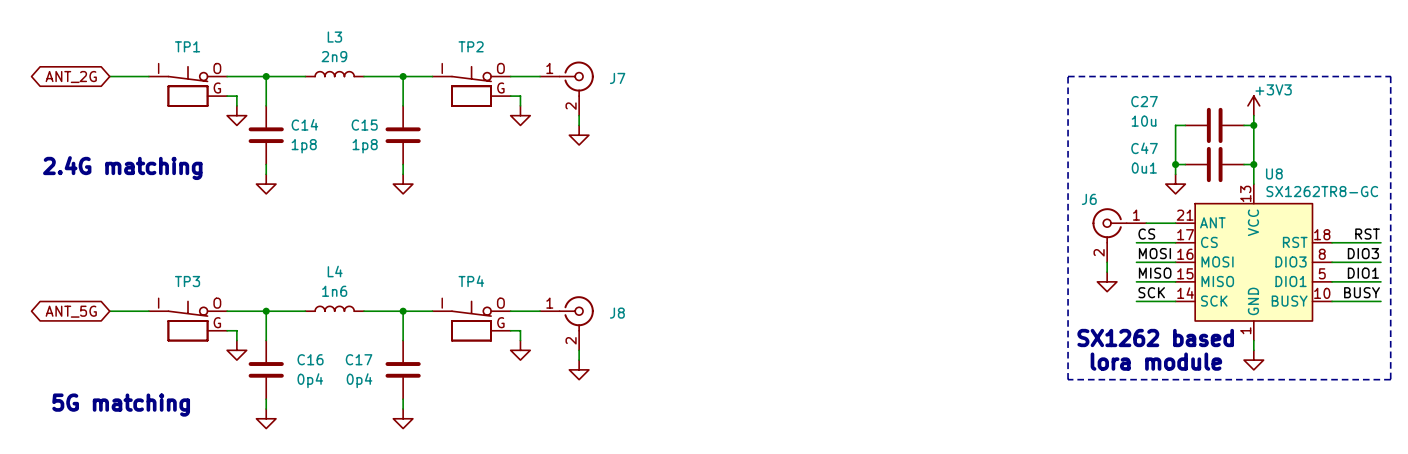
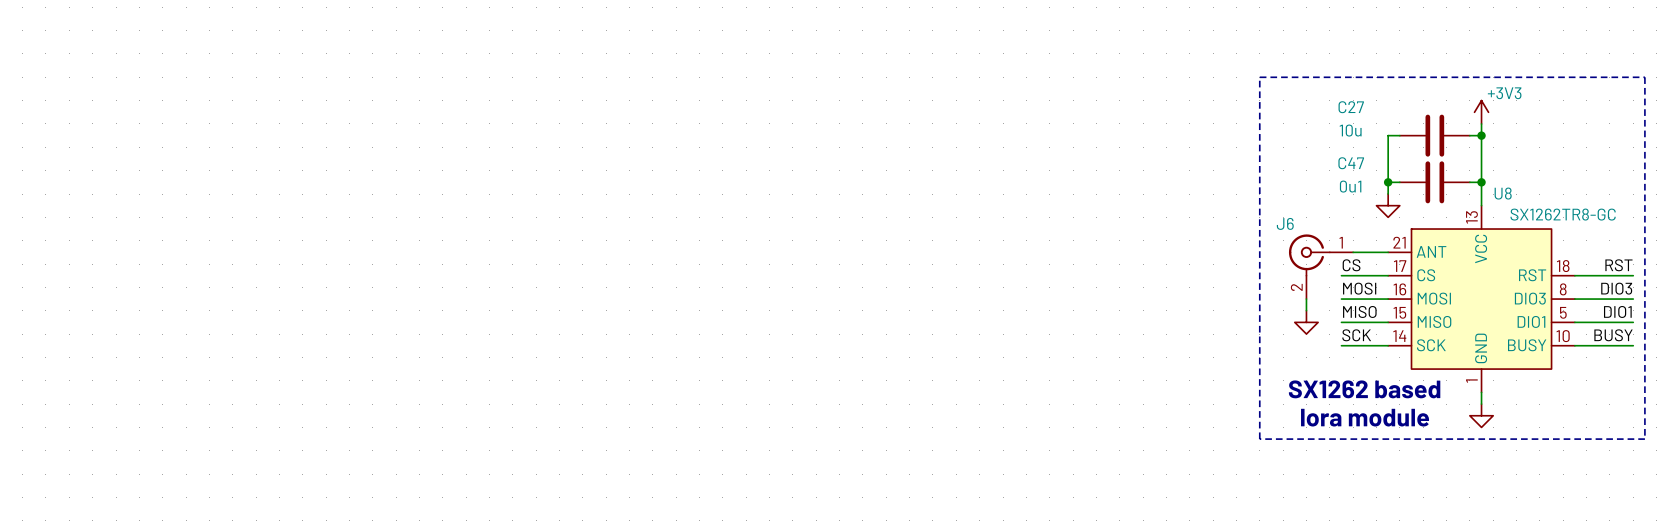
L3: 2n9 (334, 74) -> none
wire: (109, 76) (148, 76) -> none
wire: (227, 76) (305, 76) -> none
wire: (266, 76) (266, 105) -> none
junction: (266, 76) -> none
wire: (364, 76) (432, 76) -> none
wire: (403, 76) (403, 105) -> none
junction: (403, 76) -> none
wire: (510, 76) (540, 76) -> none
global label: ANT_2G (71, 77) -> none
TP1: (188, 86) -> none
TP2: (471, 86) -> none
J7: (566, 88) -> none
wire: (227, 96) (236, 96) (236, 105) -> none
wire: (510, 96) (520, 96) (520, 105) -> none
power symbol: (236, 115) -> none
power symbol: (520, 115) -> none
wire: (579, 115) (579, 125) -> none
C14: 1p8 (266, 135) -> none
C15: 1p8 (403, 135) -> none
power symbol: (579, 135) -> none
wire: (266, 164) (266, 174) -> none
wire: (403, 164) (403, 174) -> none
text: 2.4G matching (122, 168) -> none
power symbol: (266, 184) -> none
power symbol: (403, 184) -> none
L4: 1n6 (334, 308) -> none
global label: ANT_5G (71, 311) -> none
wire: (109, 311) (148, 311) -> none
wire: (227, 311) (305, 311) -> none
wire: (266, 311) (266, 340) -> none
junction: (266, 311) -> none
wire: (364, 311) (432, 311) -> none
wire: (403, 311) (403, 340) -> none
junction: (403, 311) -> none
wire: (510, 311) (540, 311) -> none
TP3: (188, 320) -> none
TP4: (471, 320) -> none
J8: (566, 323) -> none
wire: (227, 330) (236, 330) (236, 340) -> none
wire: (510, 330) (520, 330) (520, 340) -> none
power symbol: (236, 350) -> none
power symbol: (520, 350) -> none
wire: (579, 350) (579, 360) -> none
C16: 0p4 (266, 369) -> none
C17: 0p4 (403, 369) -> none
power symbol: (579, 369) -> none
wire: (266, 399) (266, 408) -> none
wire: (403, 399) (403, 408) -> none
text: 5G matching (121, 405) -> none
power symbol: (266, 418) -> none
power symbol: (403, 418) -> none

